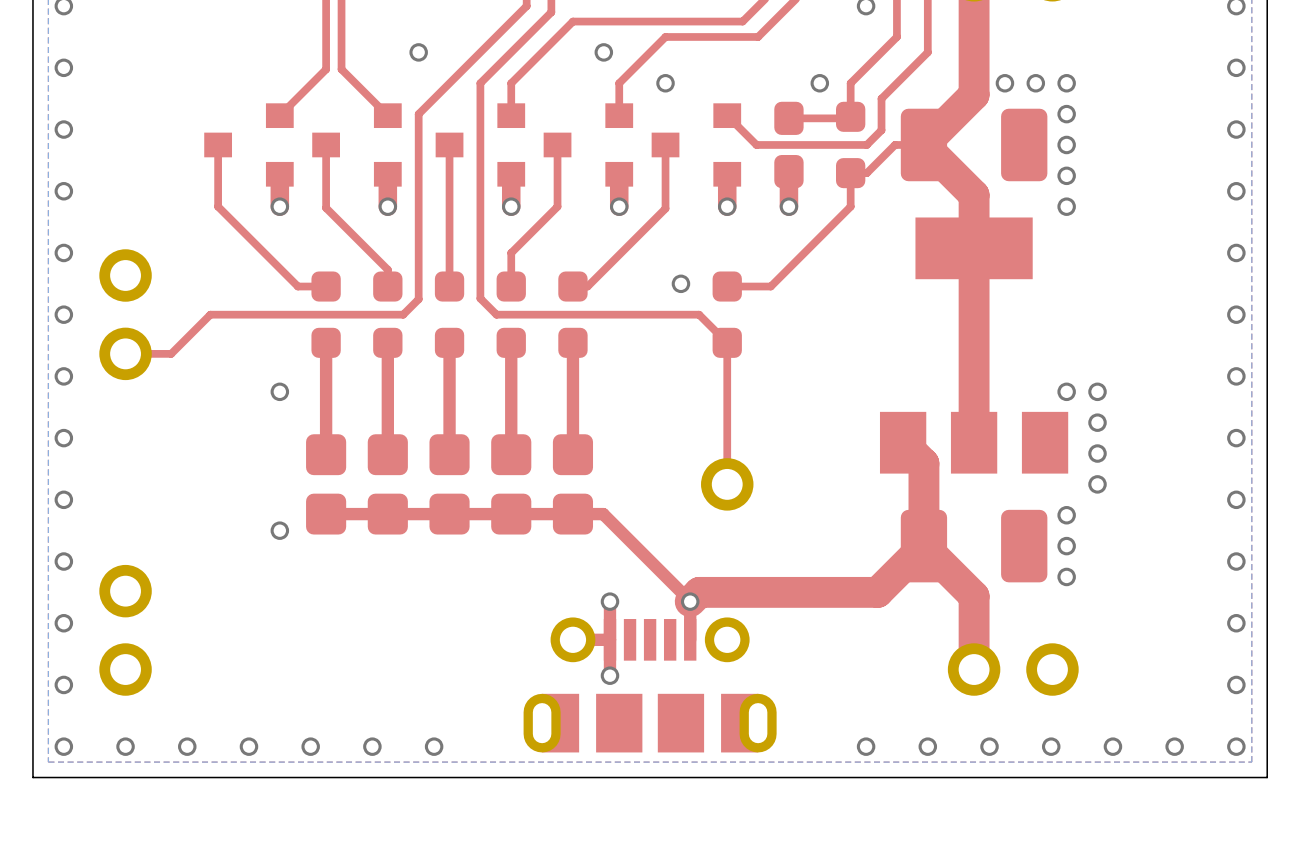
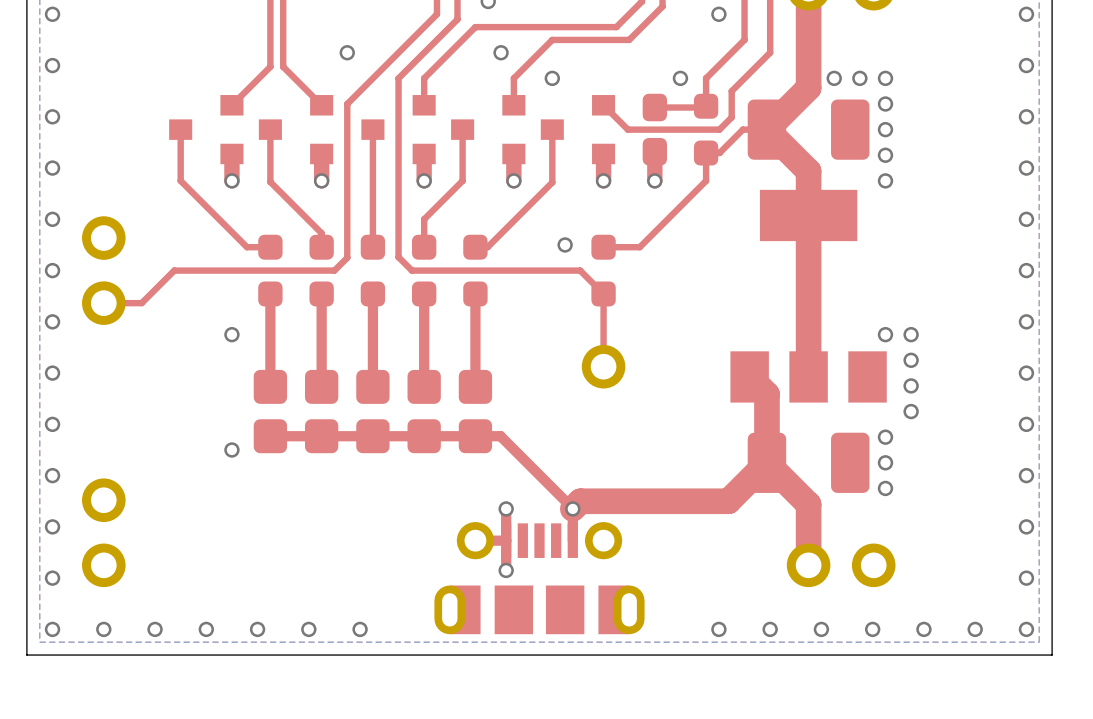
top track: (727, 430) (727, 484) -> none
part position: (727, 484) -> (603, 366)

